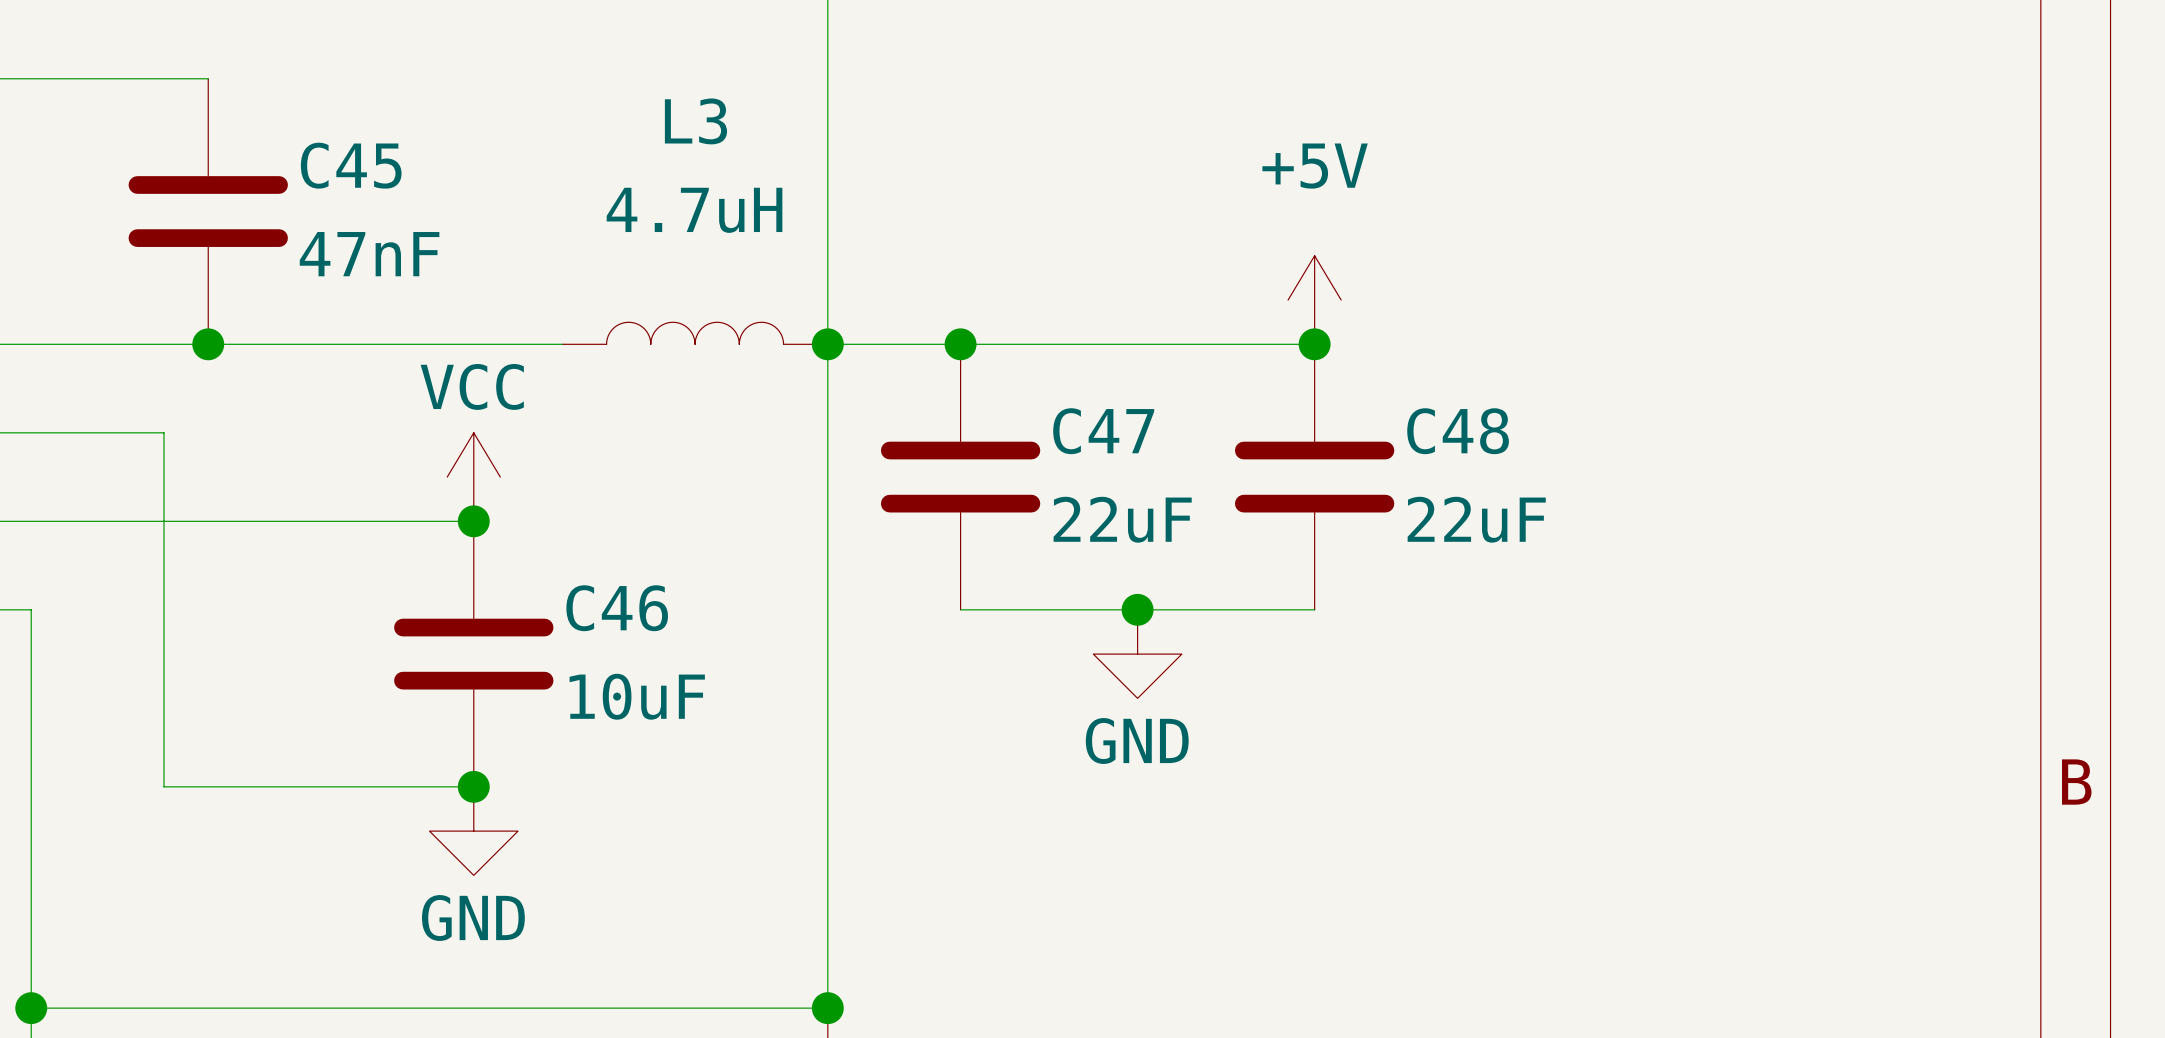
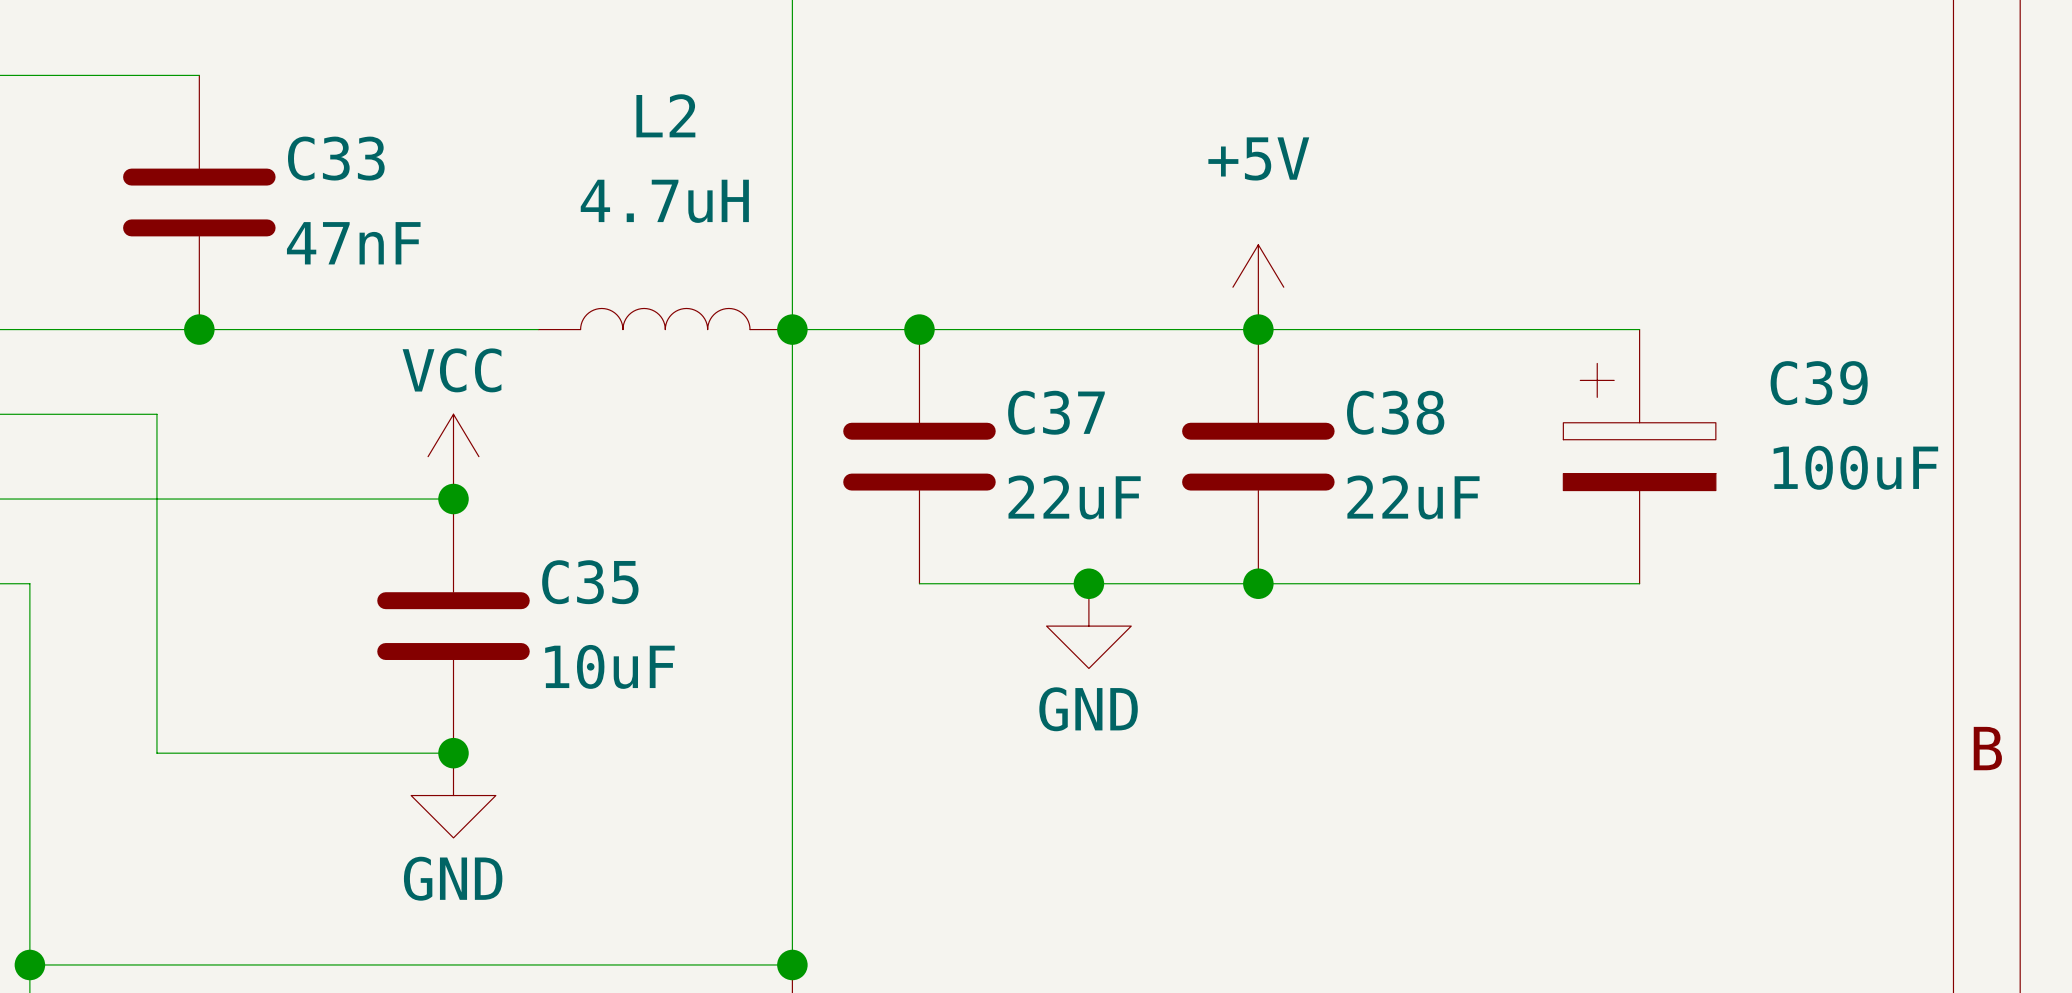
L3 name: L3 (695, 121) -> L2 (665, 115)
C45 name: C45 (351, 165) -> C33 (336, 158)
wire: none -> (1258, 329) (1639, 329)
C47 name: C47 (1103, 431) -> C37 (1056, 412)
C48 name: C48 (1458, 431) -> C38 (1395, 412)
C39: none -> 100uF (1639, 456)
C46 name: C46 (617, 608) -> C35 (590, 582)
wire: none -> (1258, 583) (1639, 583)
junction: none -> (1258, 583)

